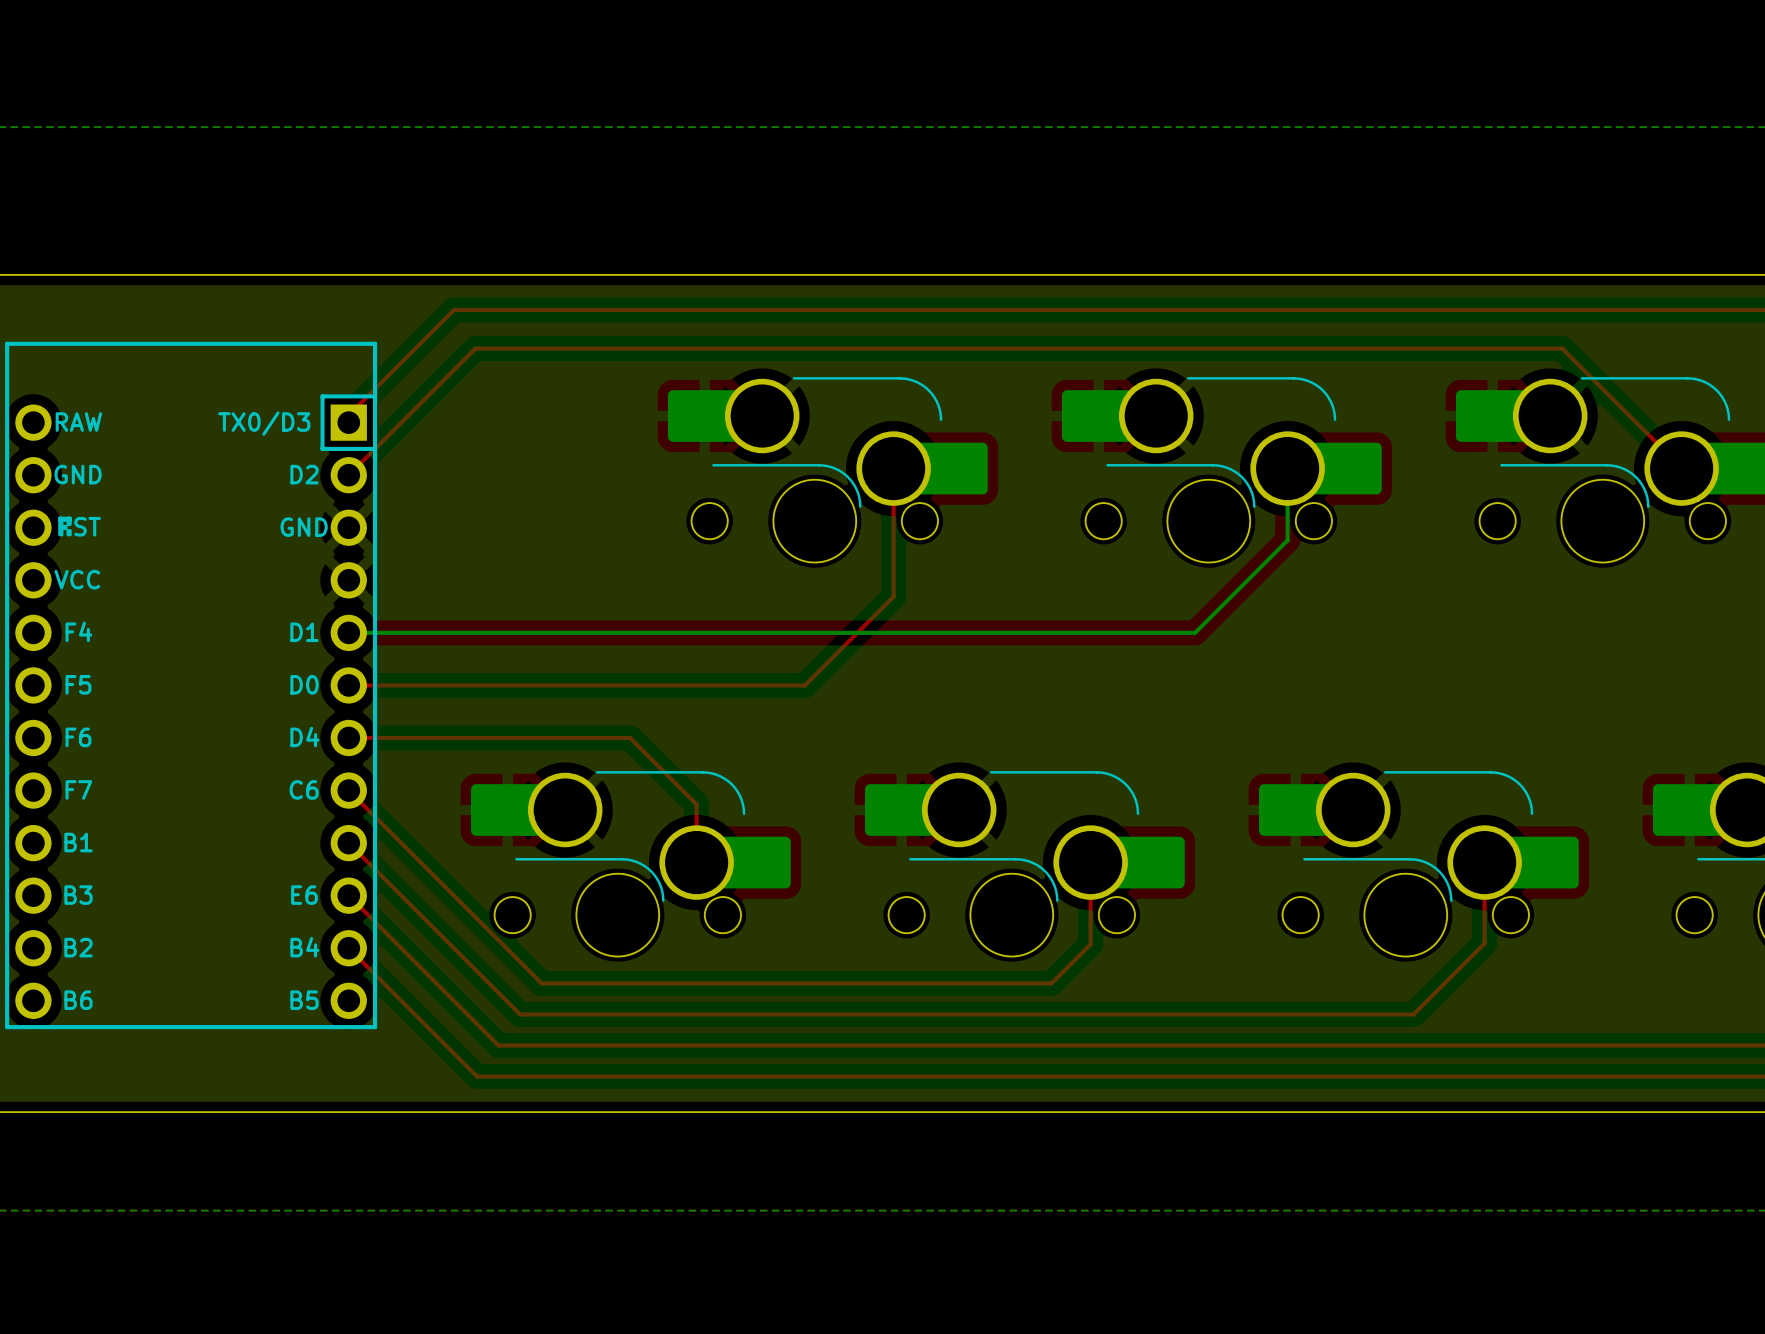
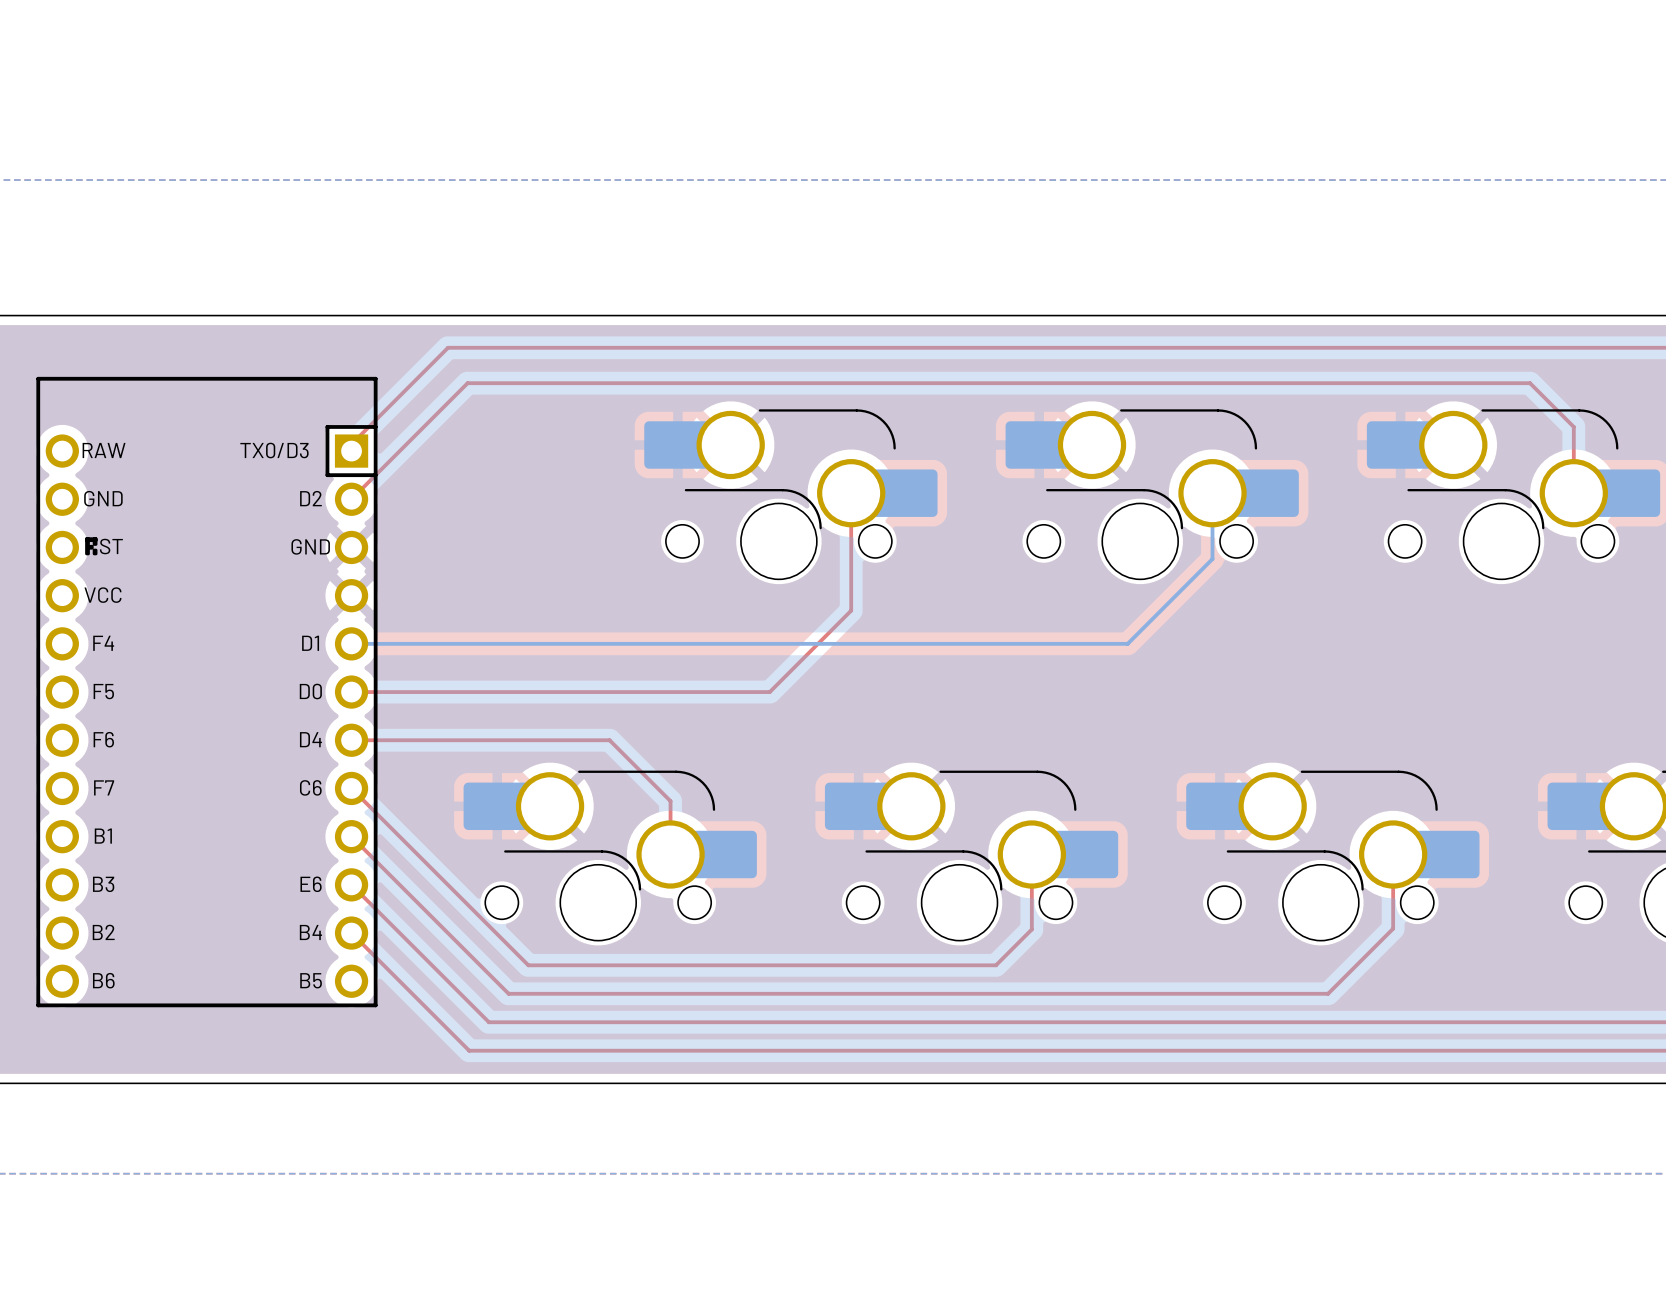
top track: (1562, 348) (1681, 467) -> (1464, 383) (1530, 383) (1573, 426) (1573, 492)

